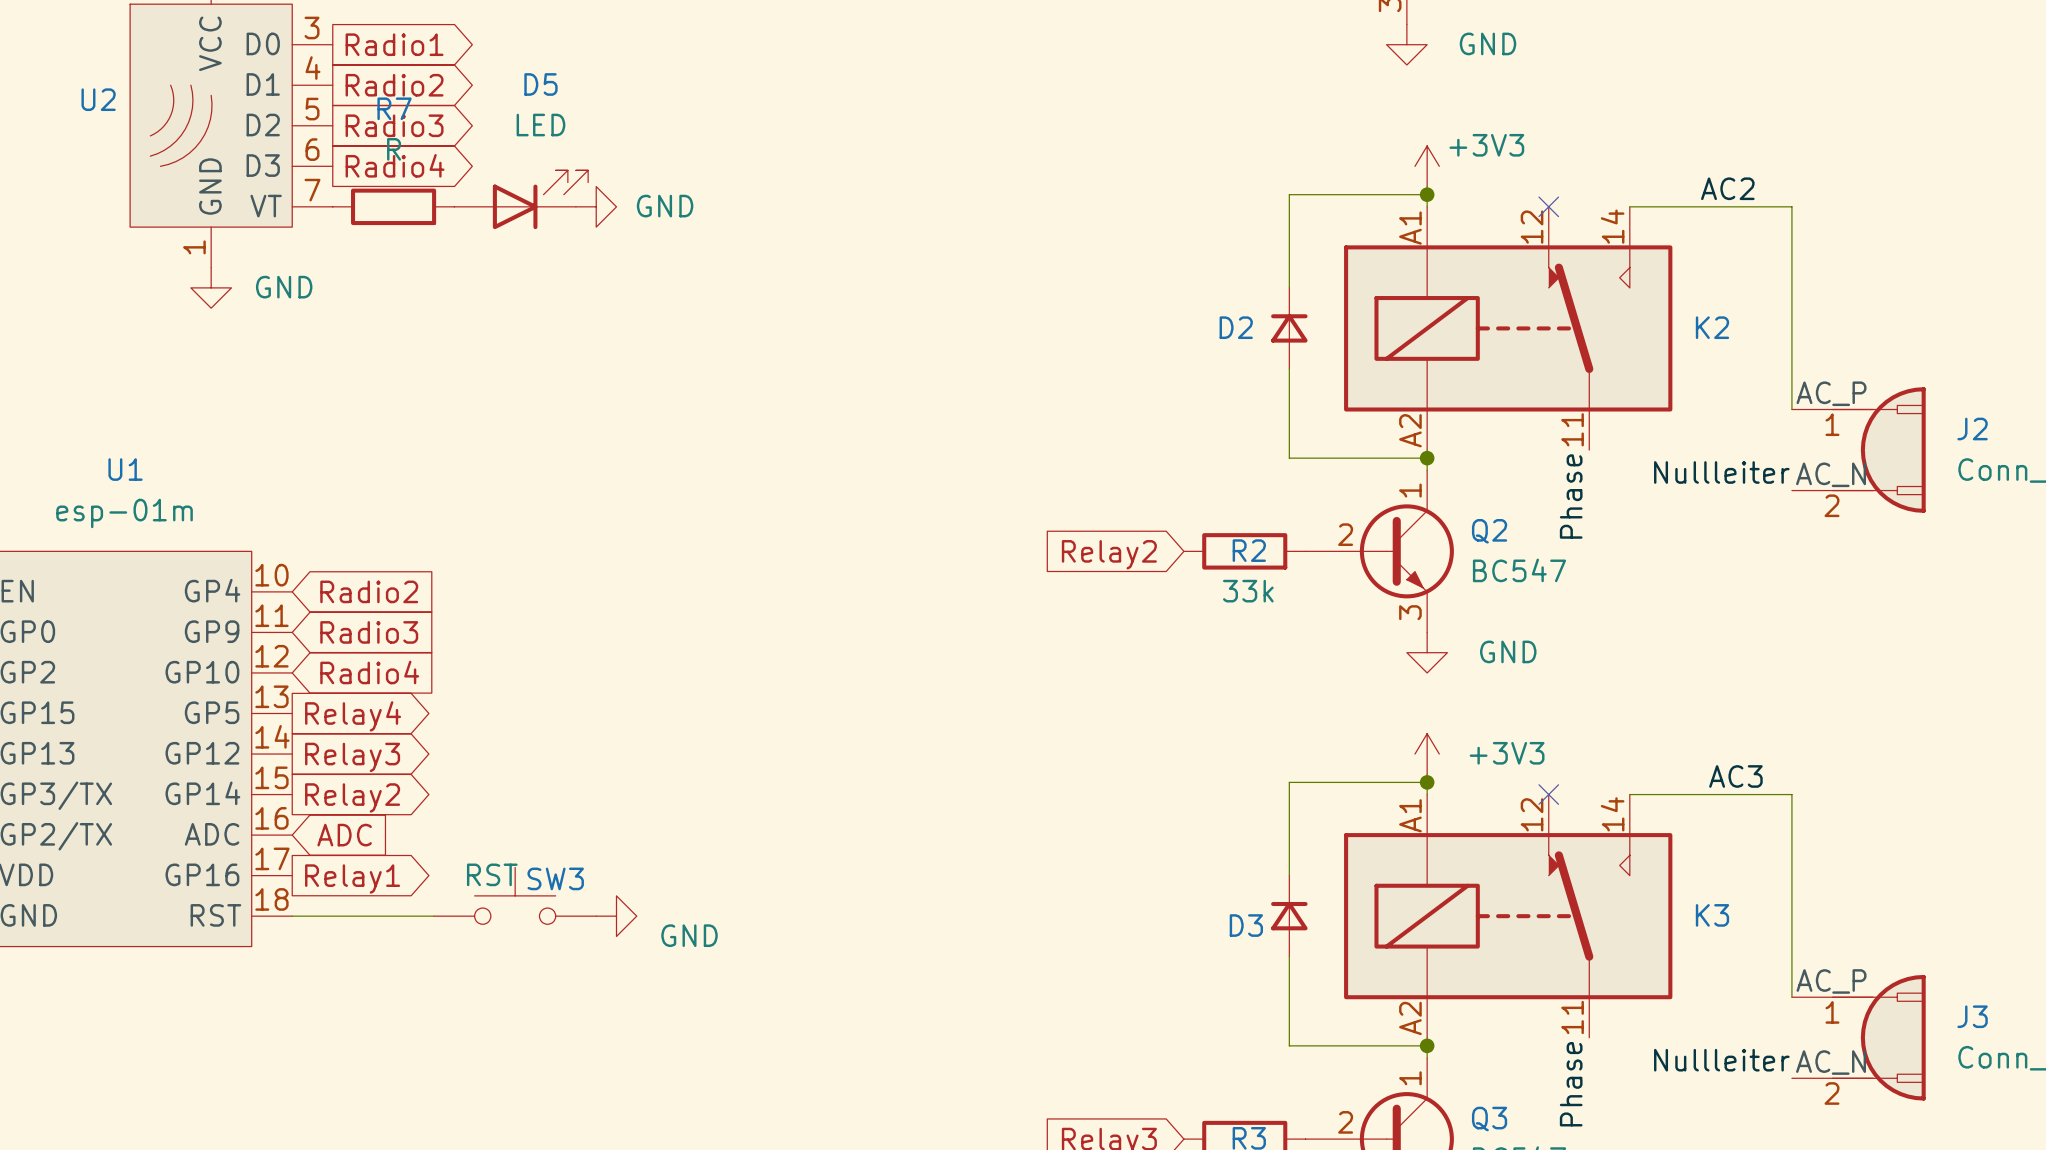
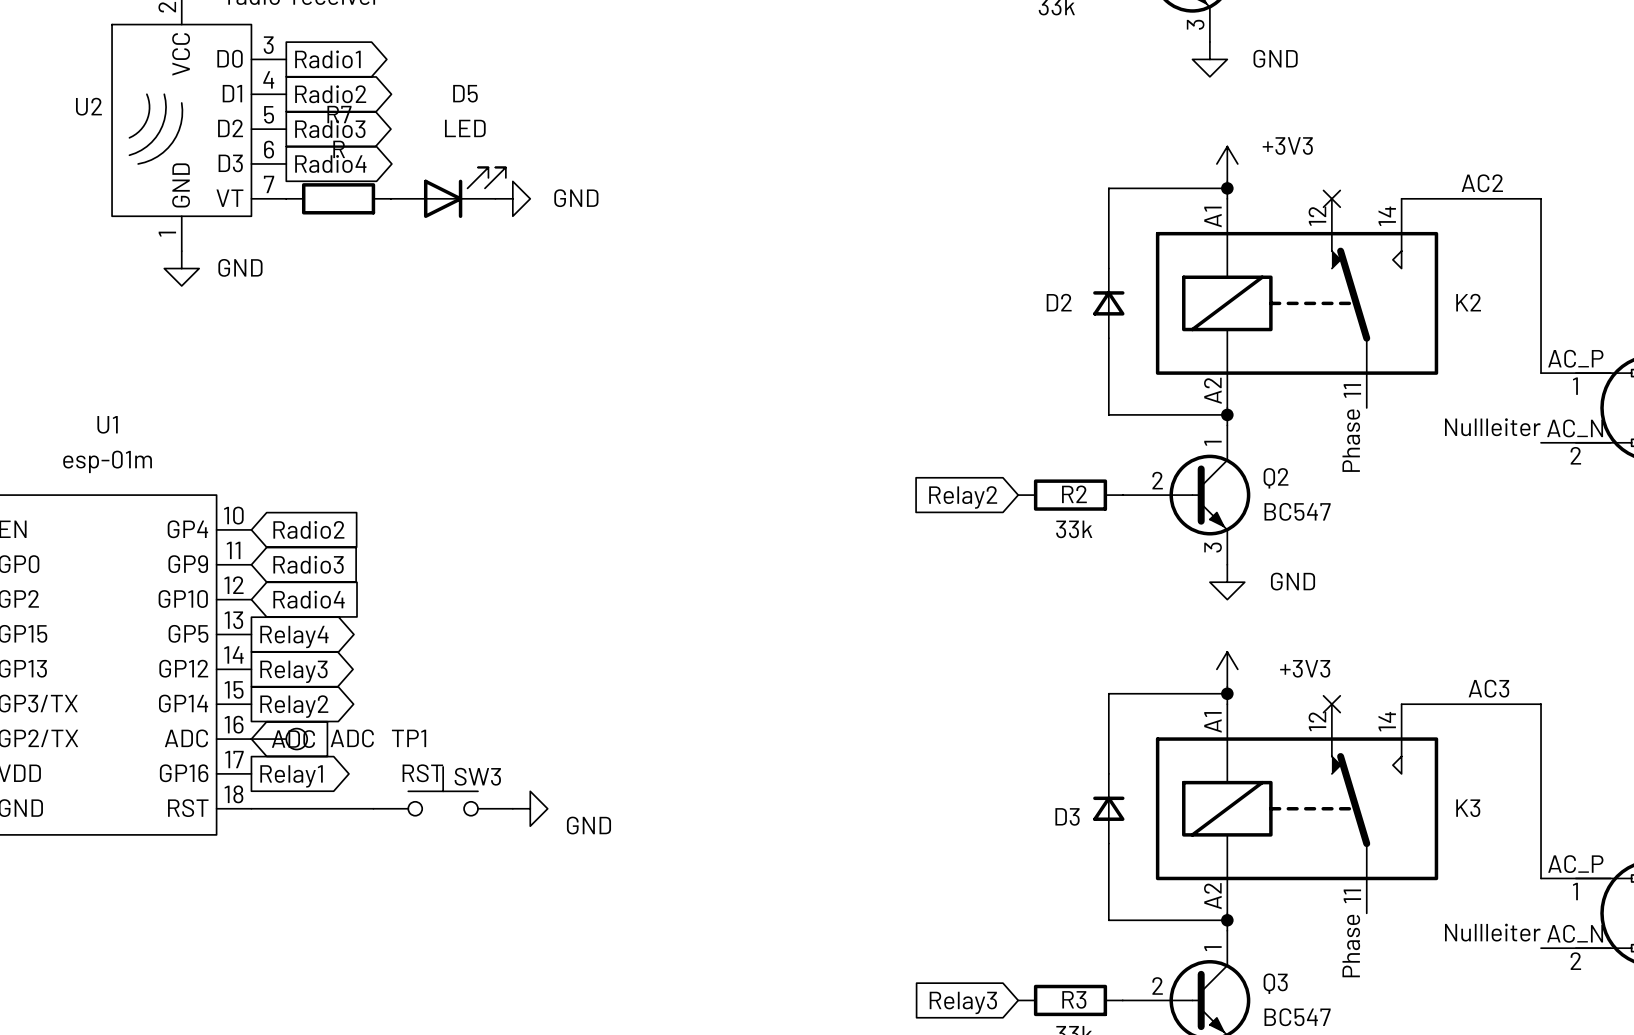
TP1: none -> ADC (279, 739)

